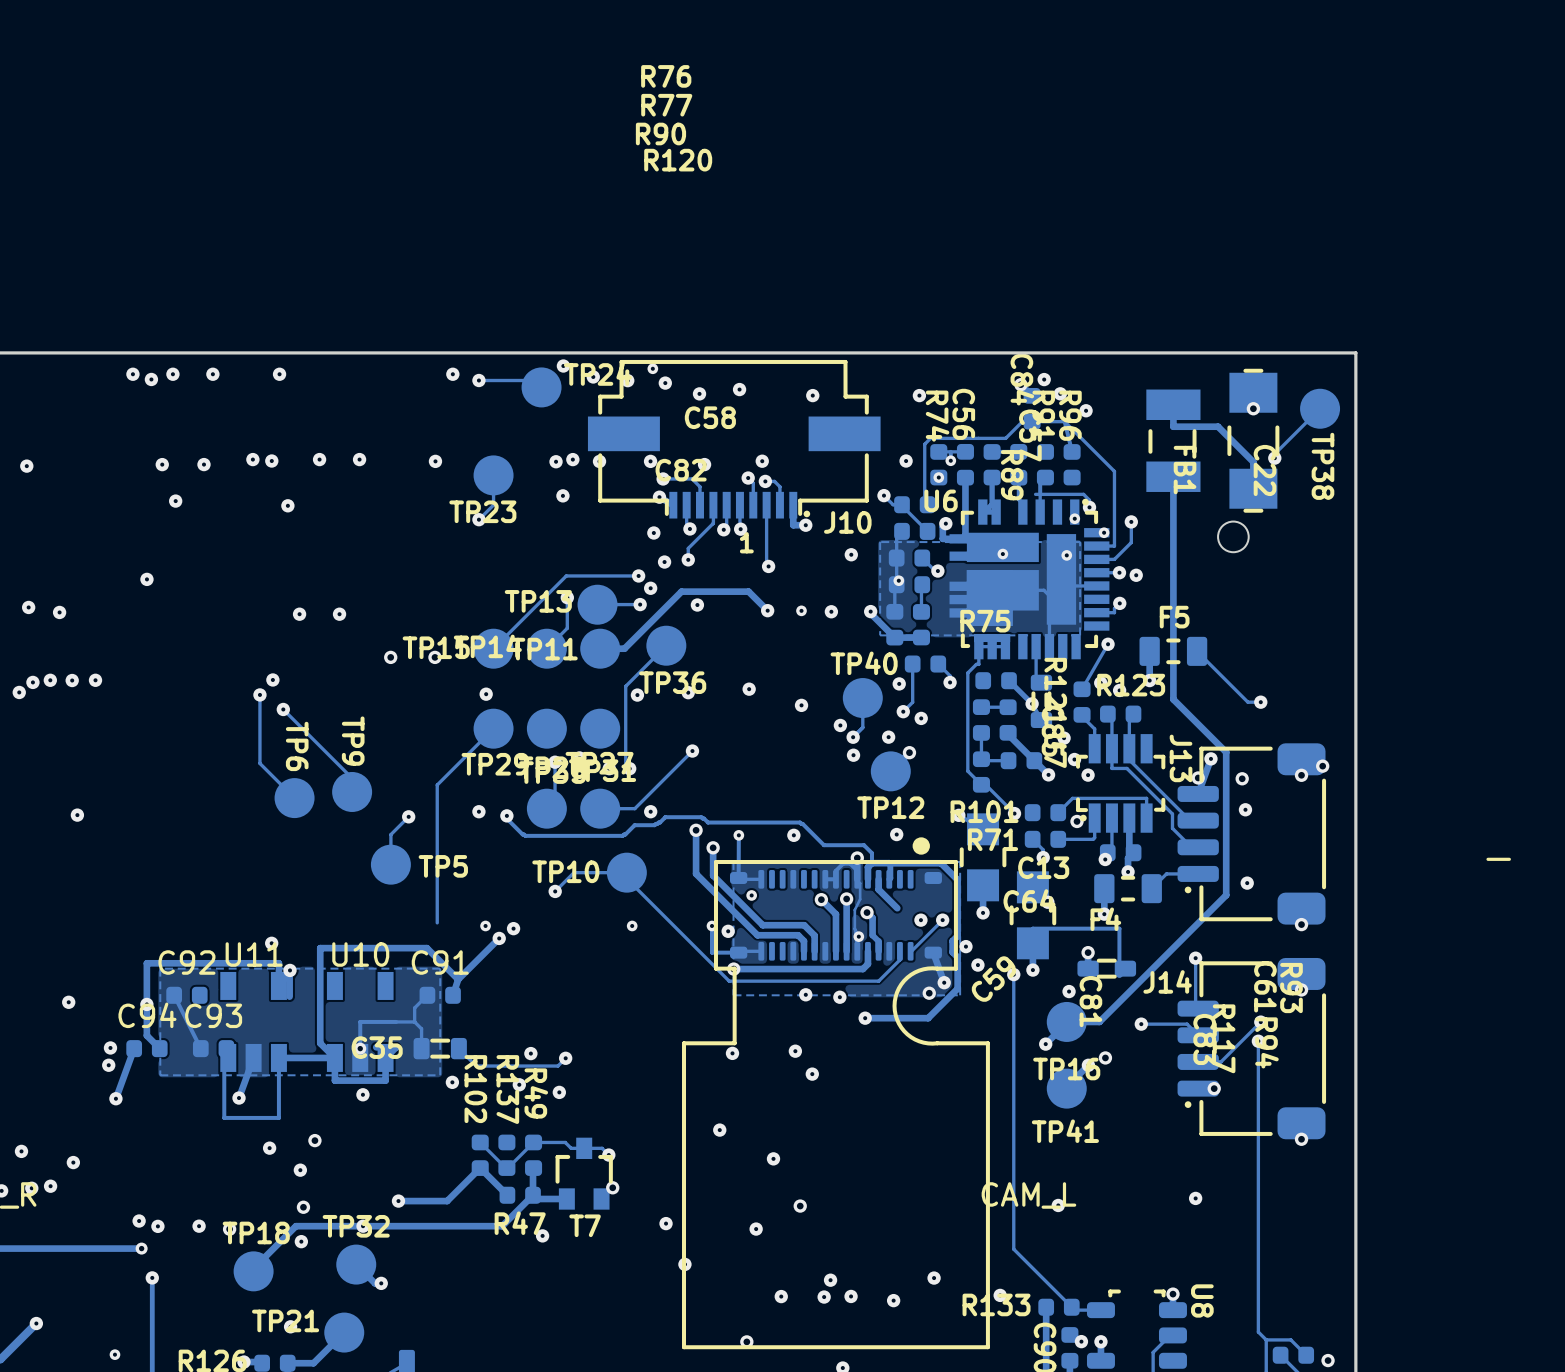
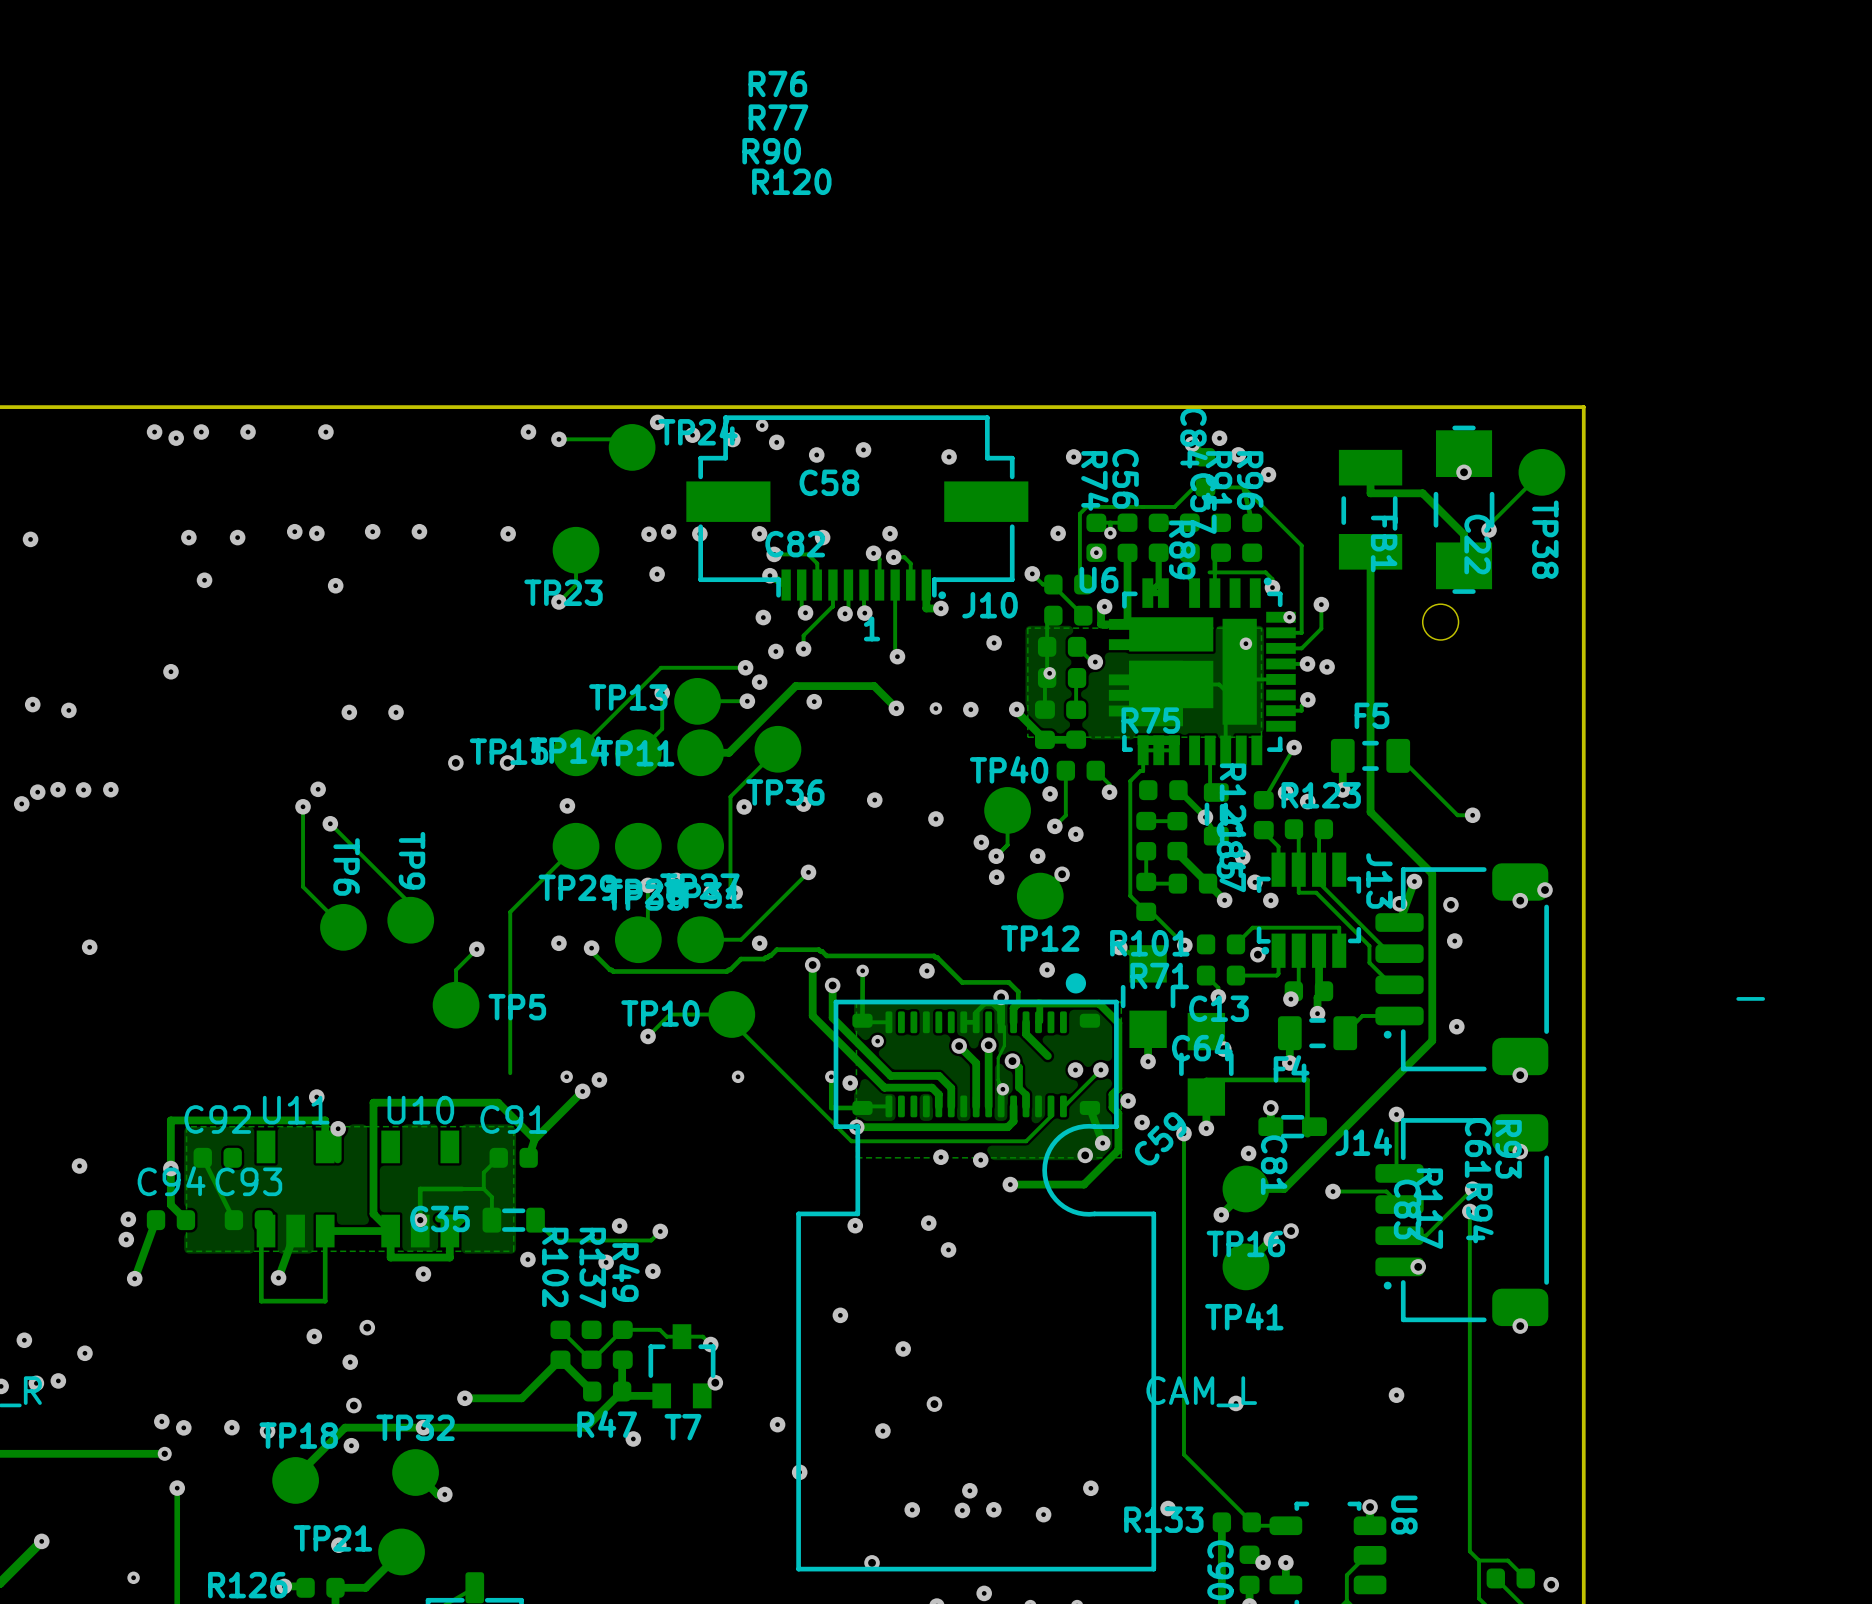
via: (1074, 518) -> none
via: (1002, 554) -> none

